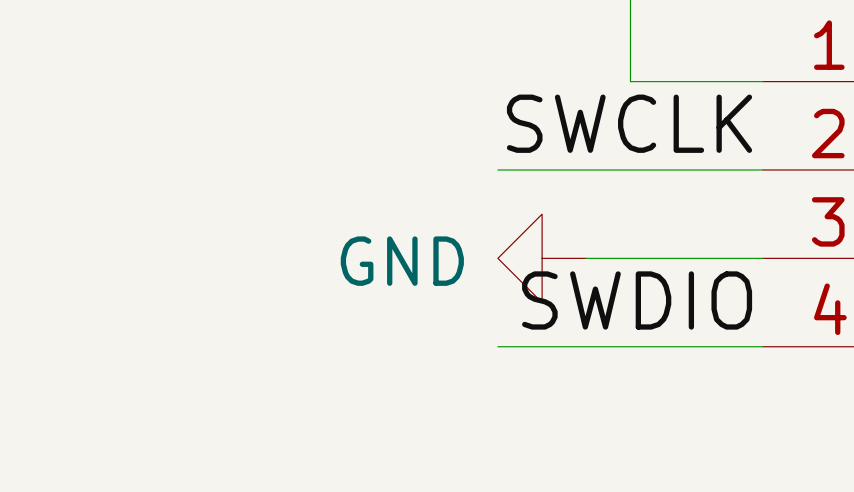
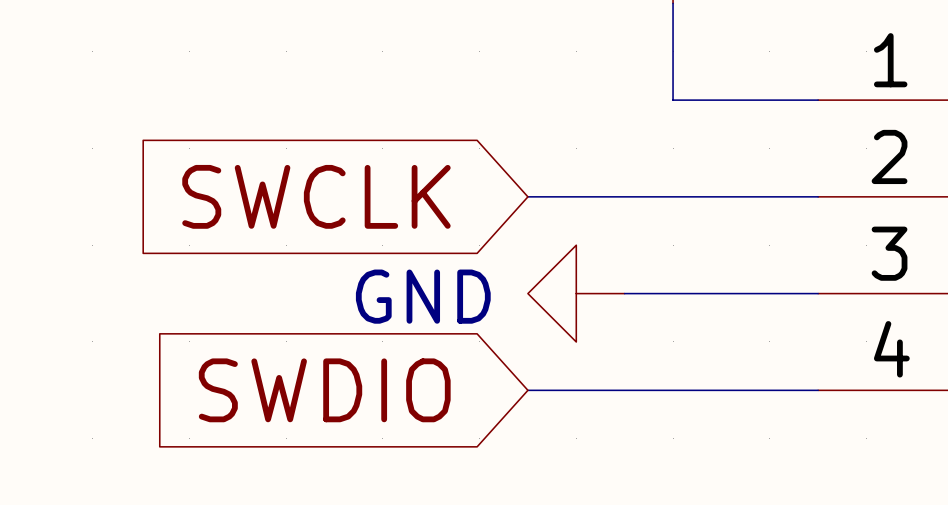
label: SWCLK (629, 123) -> none
global label: none -> SWCLK (316, 196)
label: SWDIO (637, 300) -> none
global label: none -> SWDIO (324, 390)

